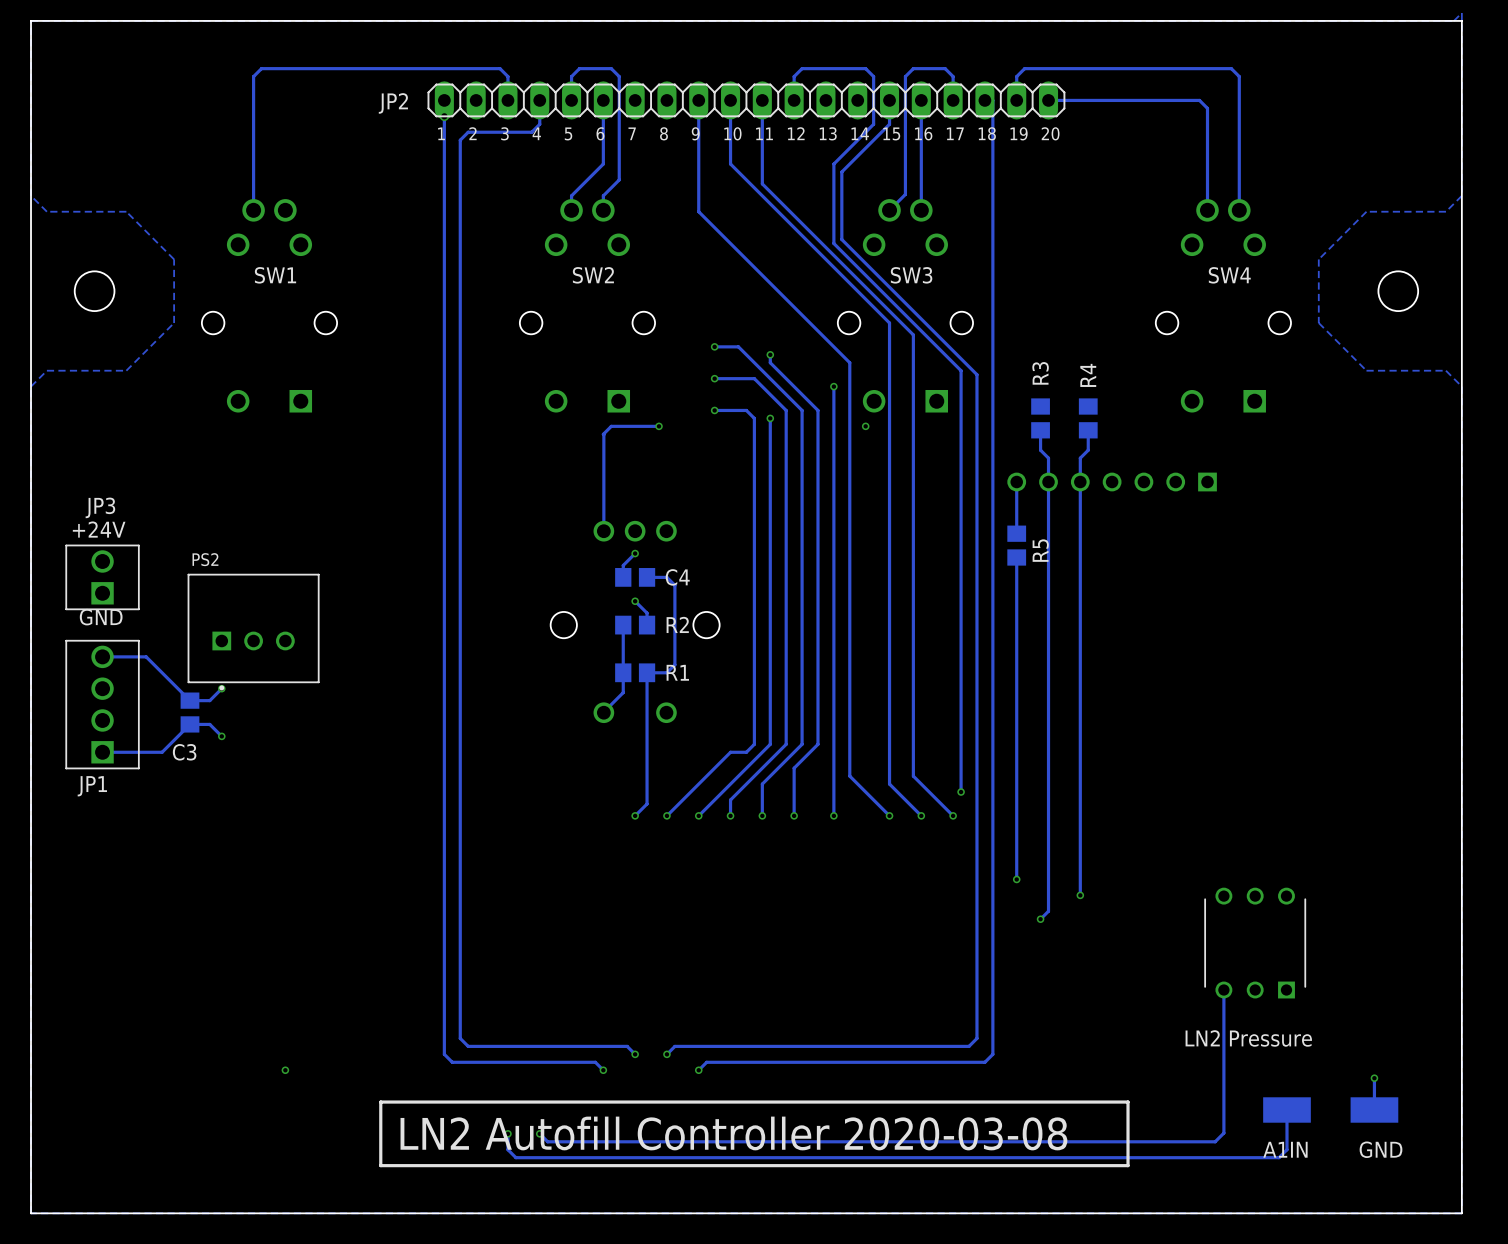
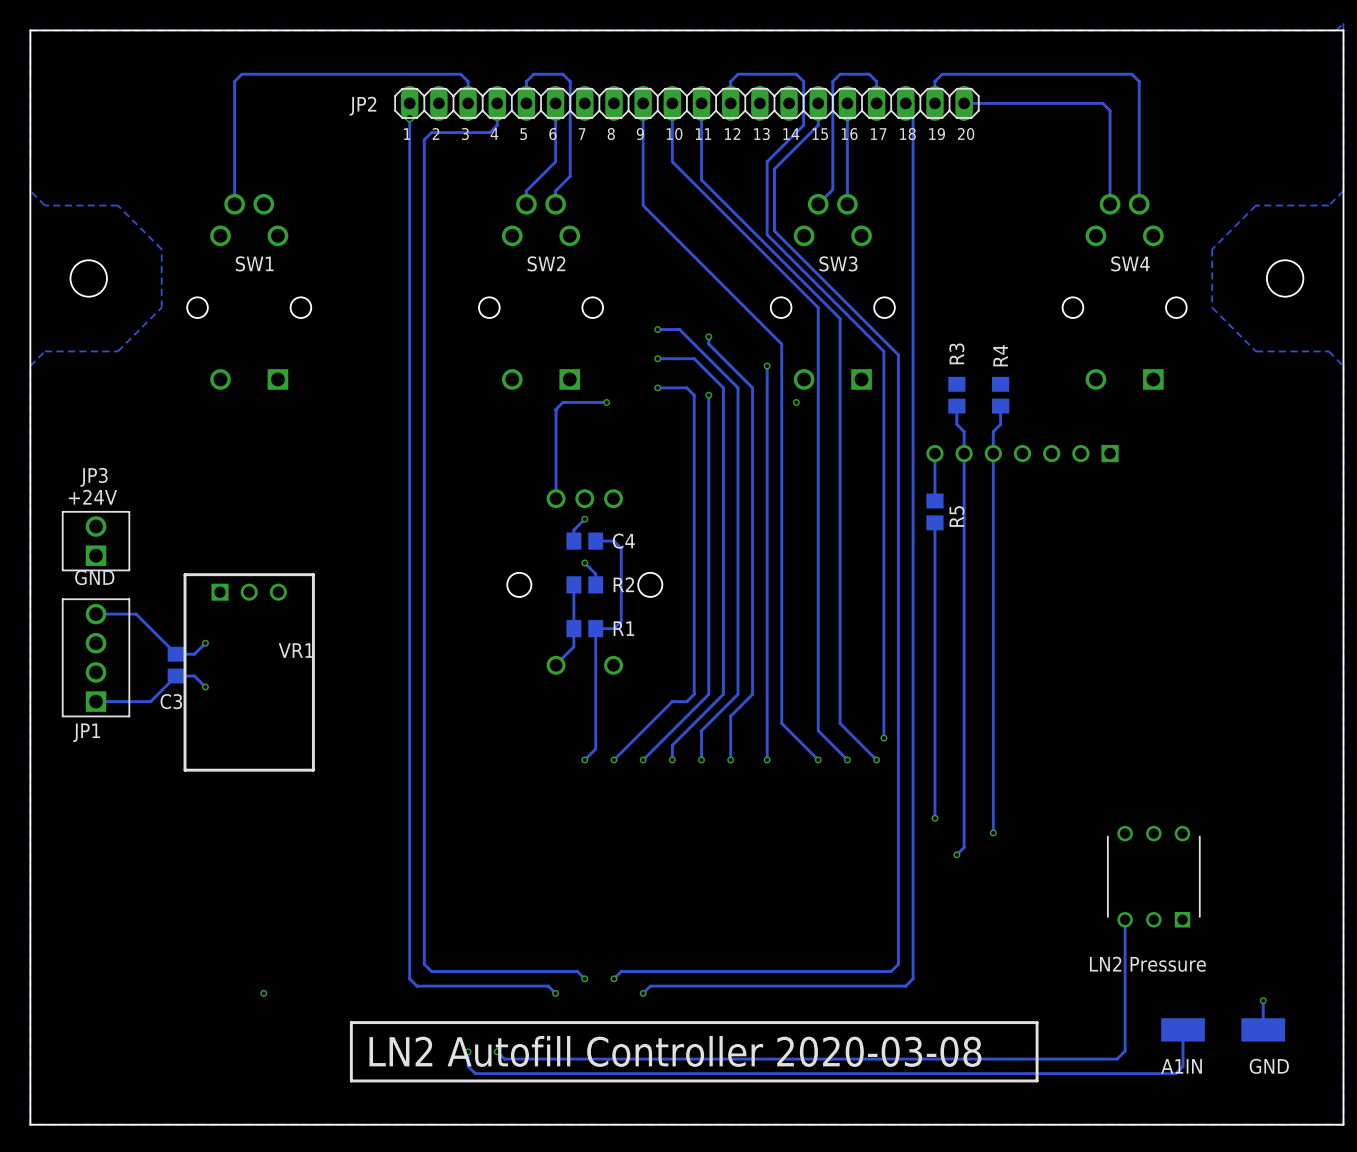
PS2: (253, 632) -> none
VR1: none -> (249, 672)

